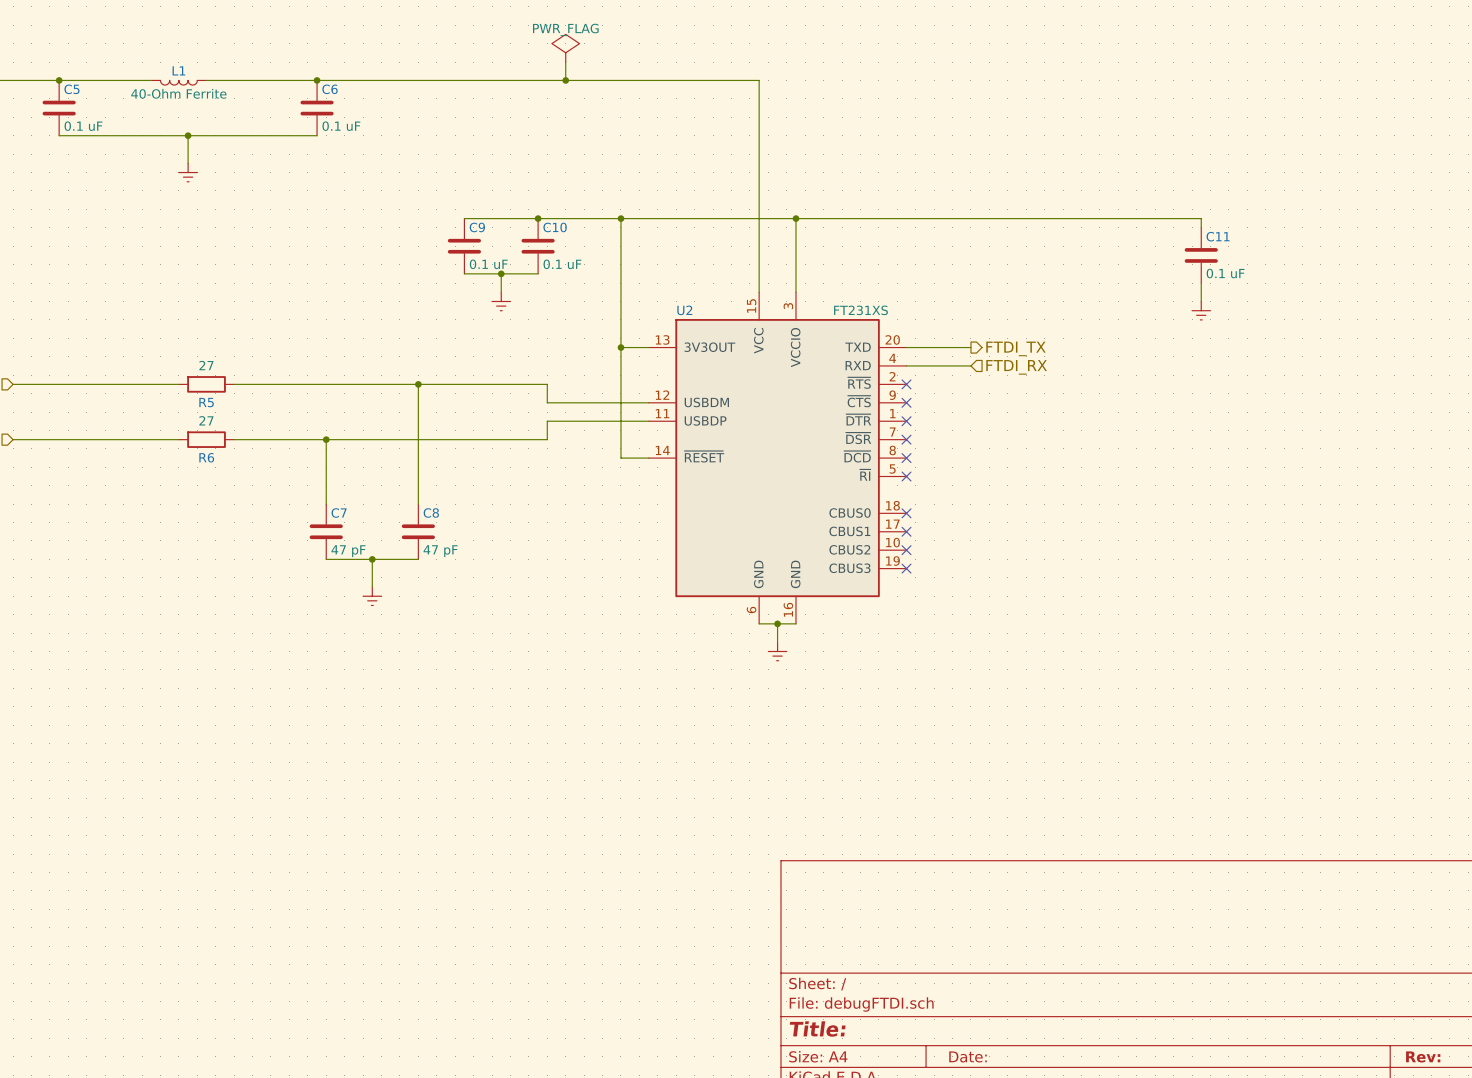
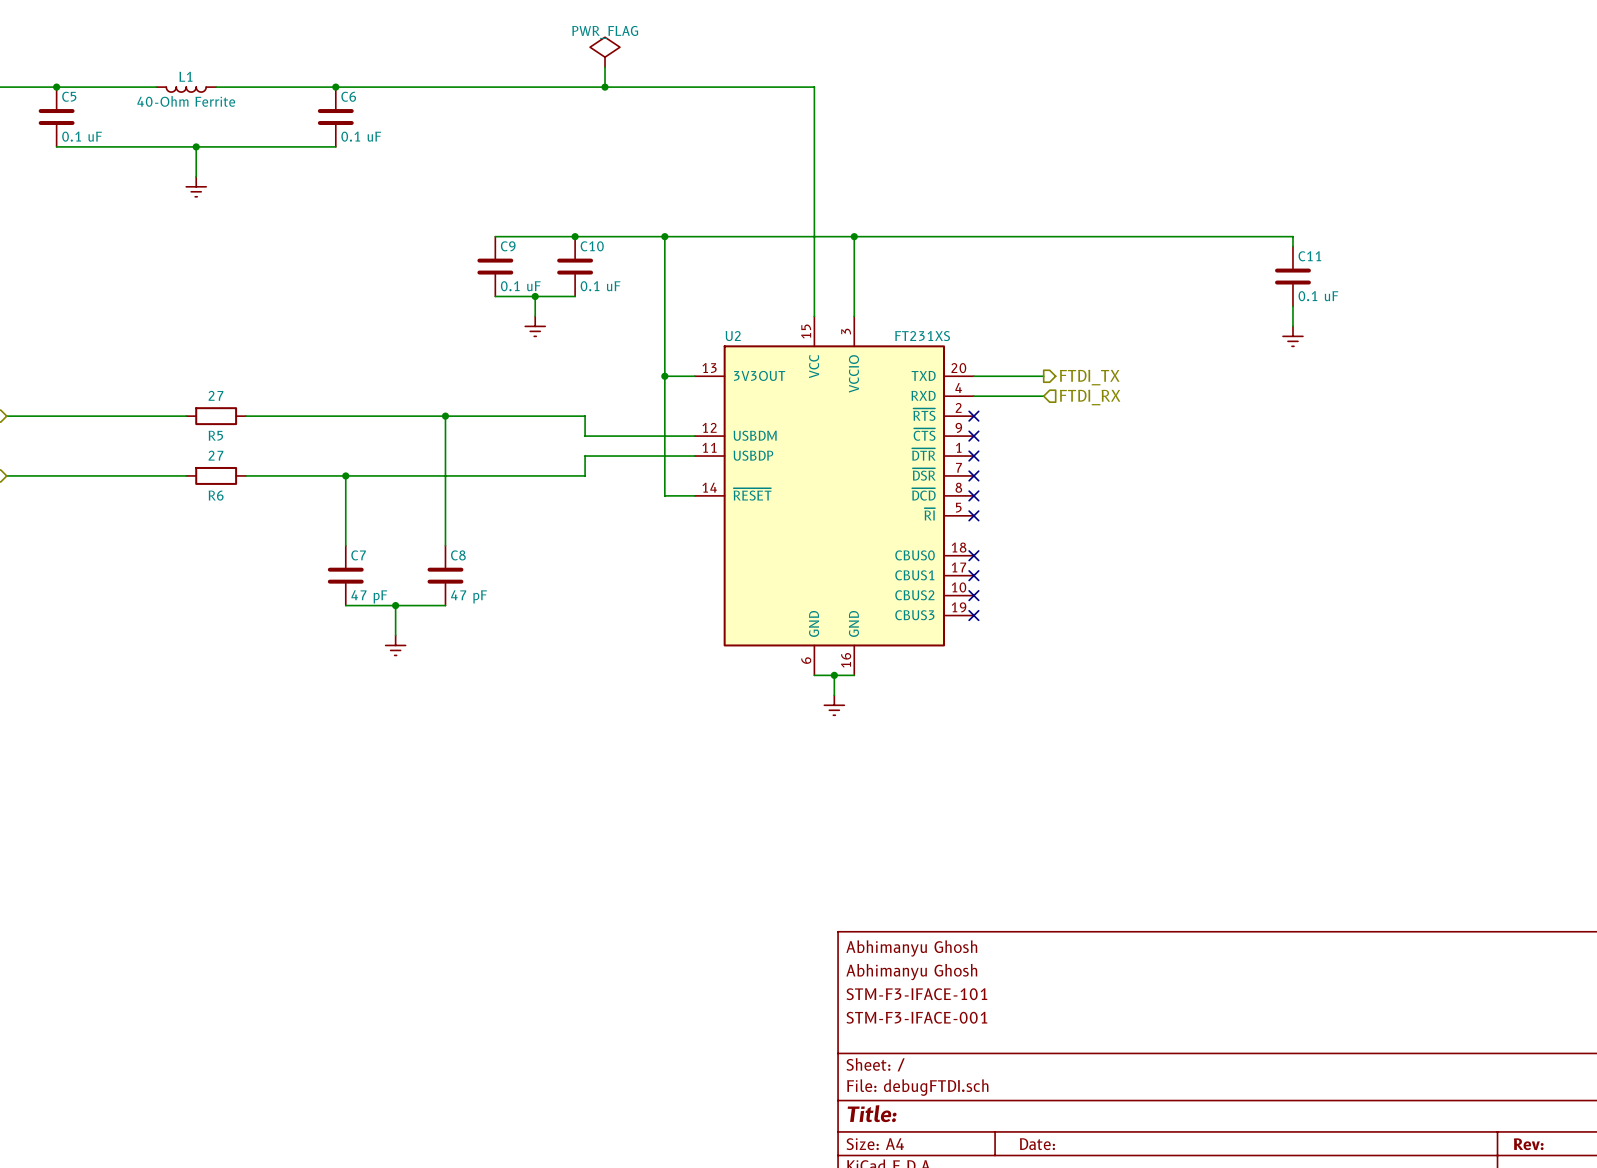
title block: none -> Abhimanyu Ghosh (911, 948)
title block: none -> Abhimanyu Ghosh (911, 972)
title block: none -> STM-F3-IFACE-101 (916, 994)
title block: none -> STM-F3-IFACE-001 (916, 1017)

